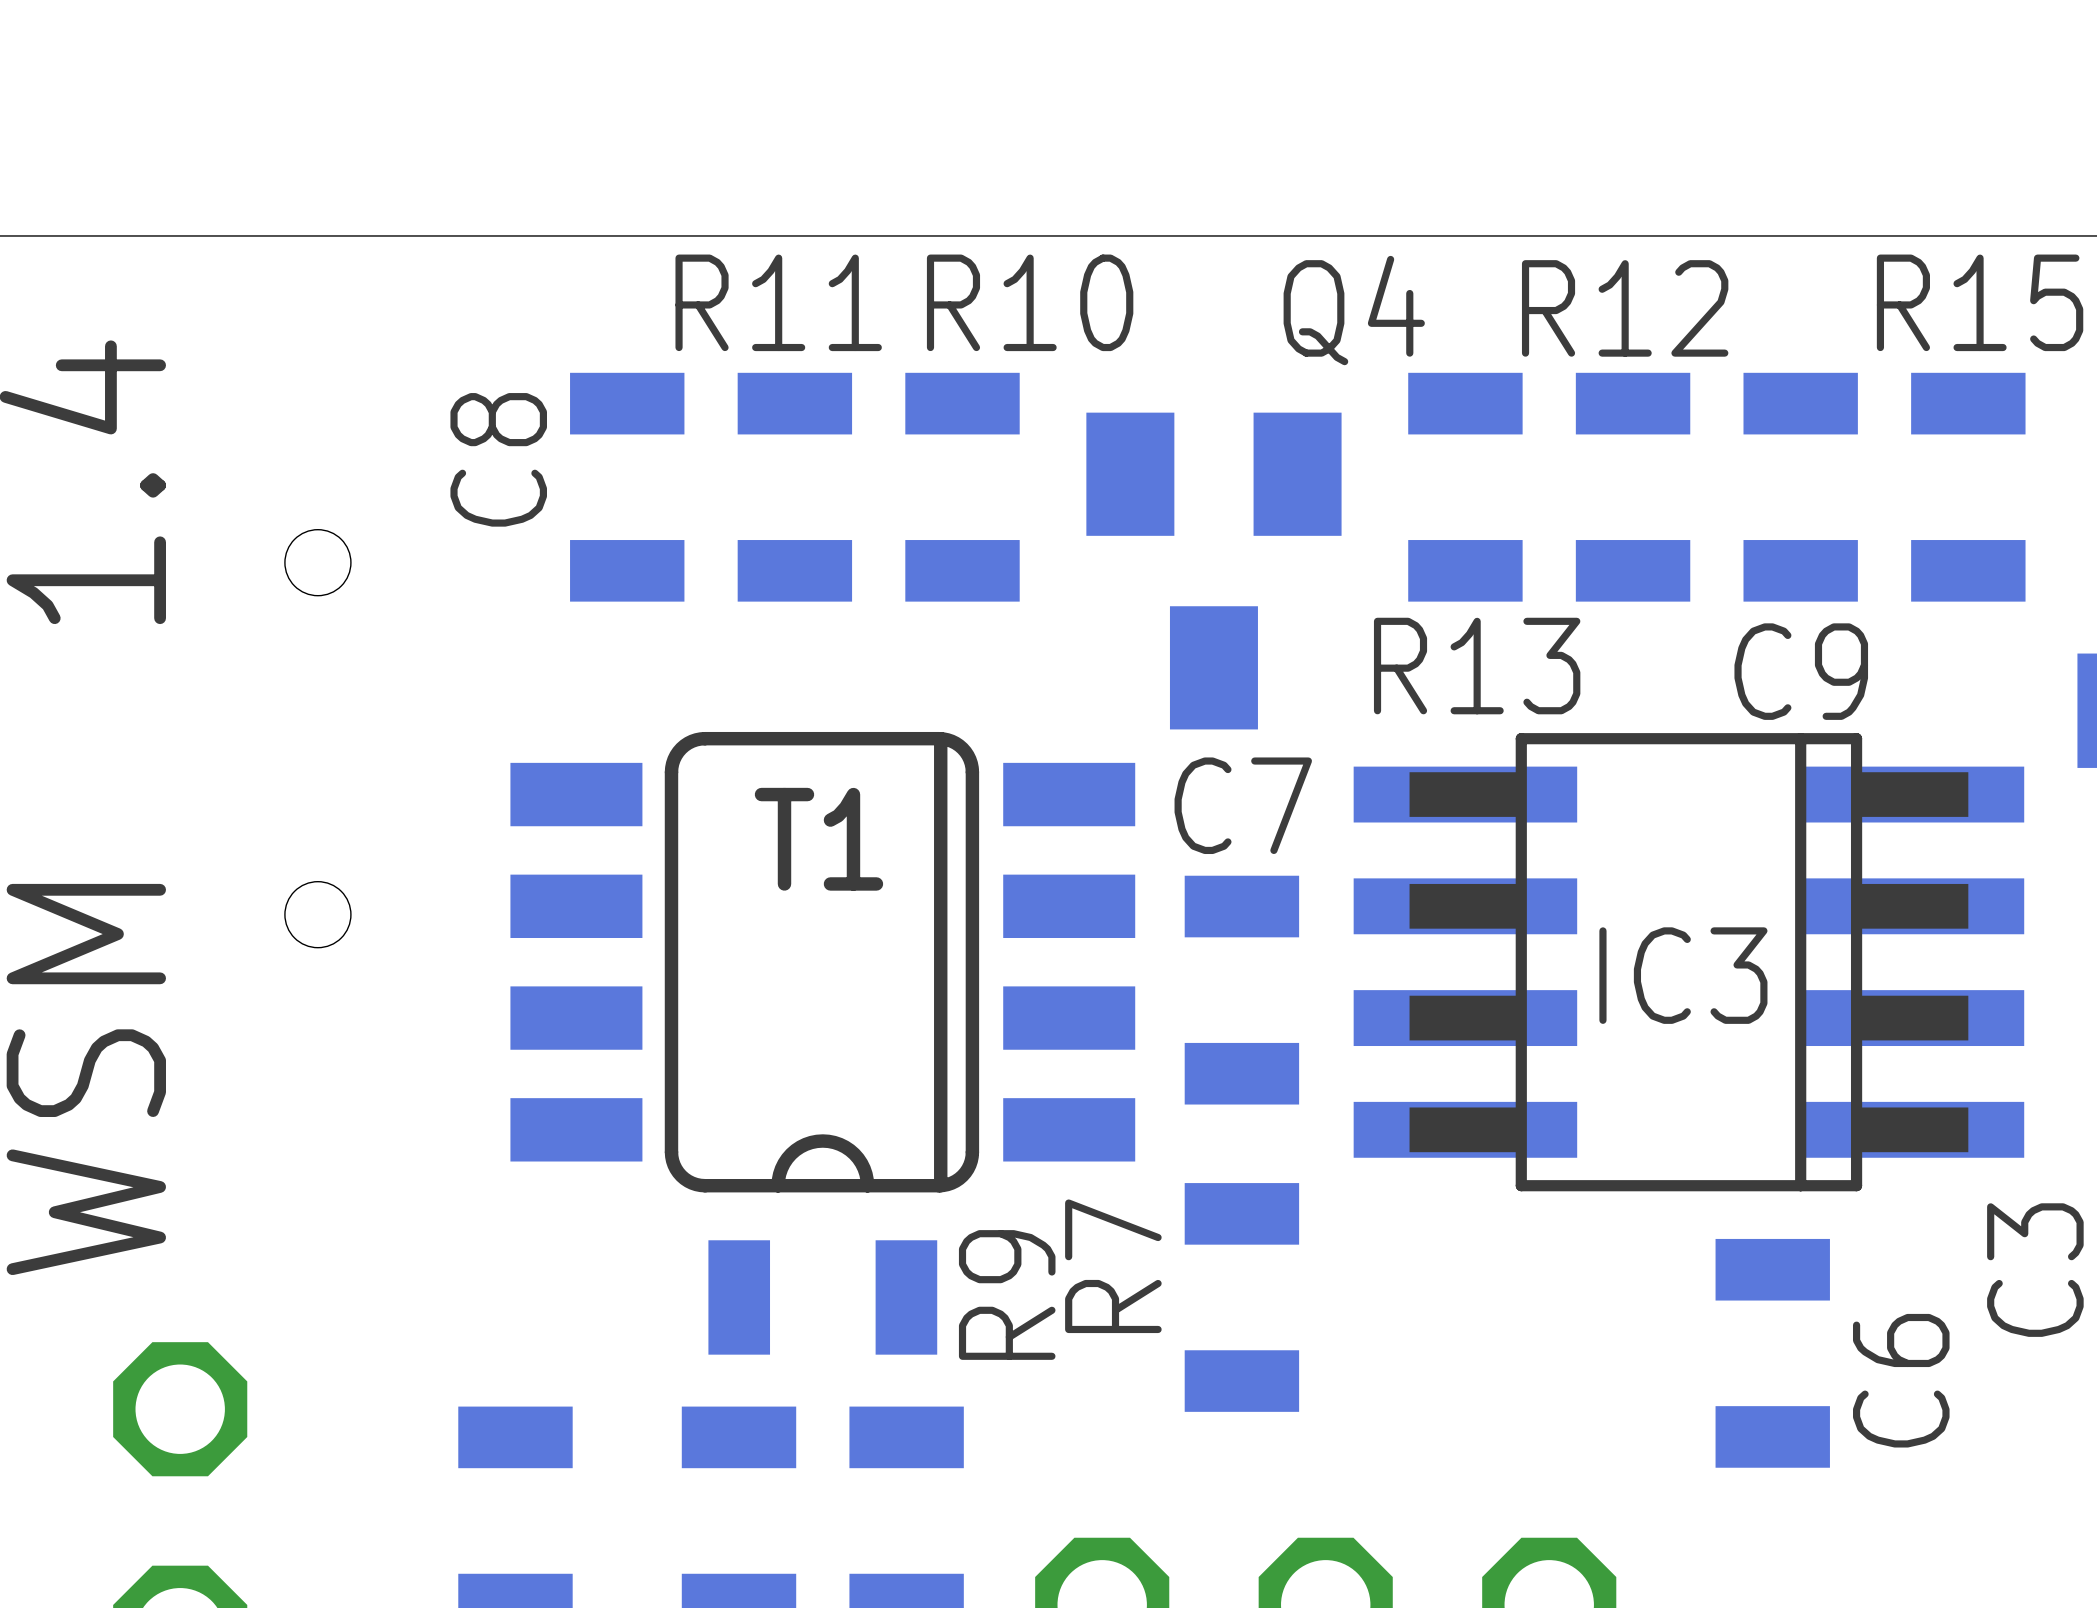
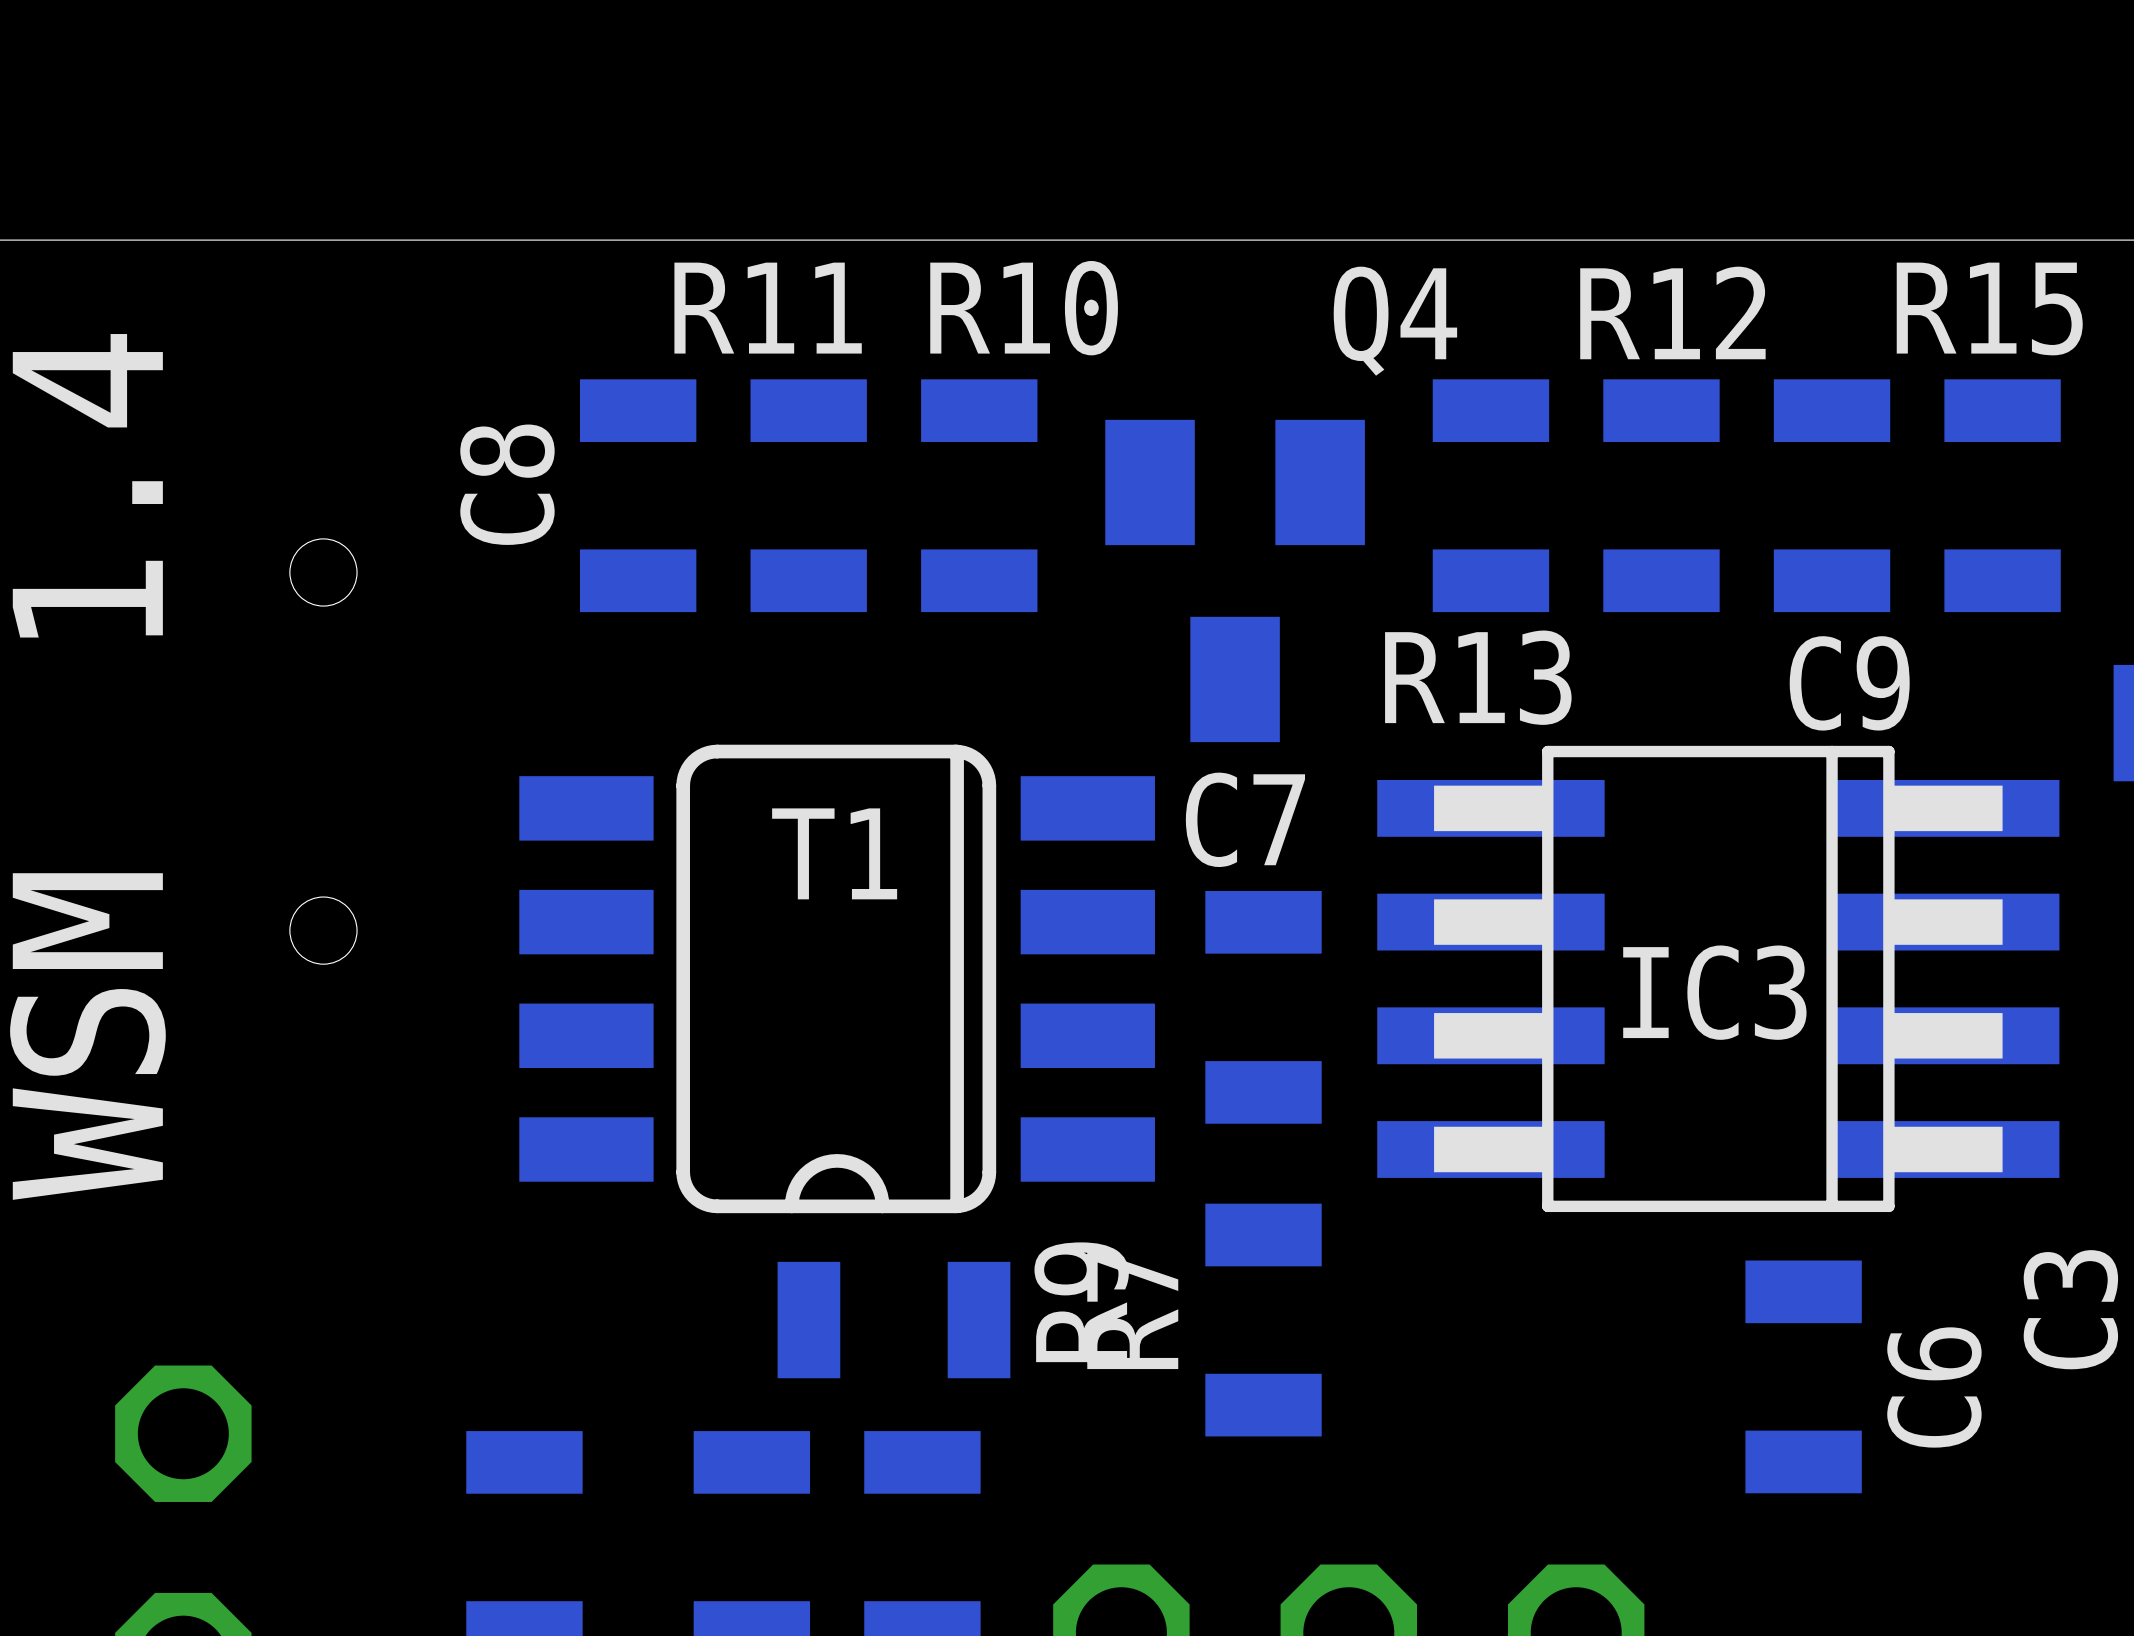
R9 position: (822, 1297) -> (893, 1320)

